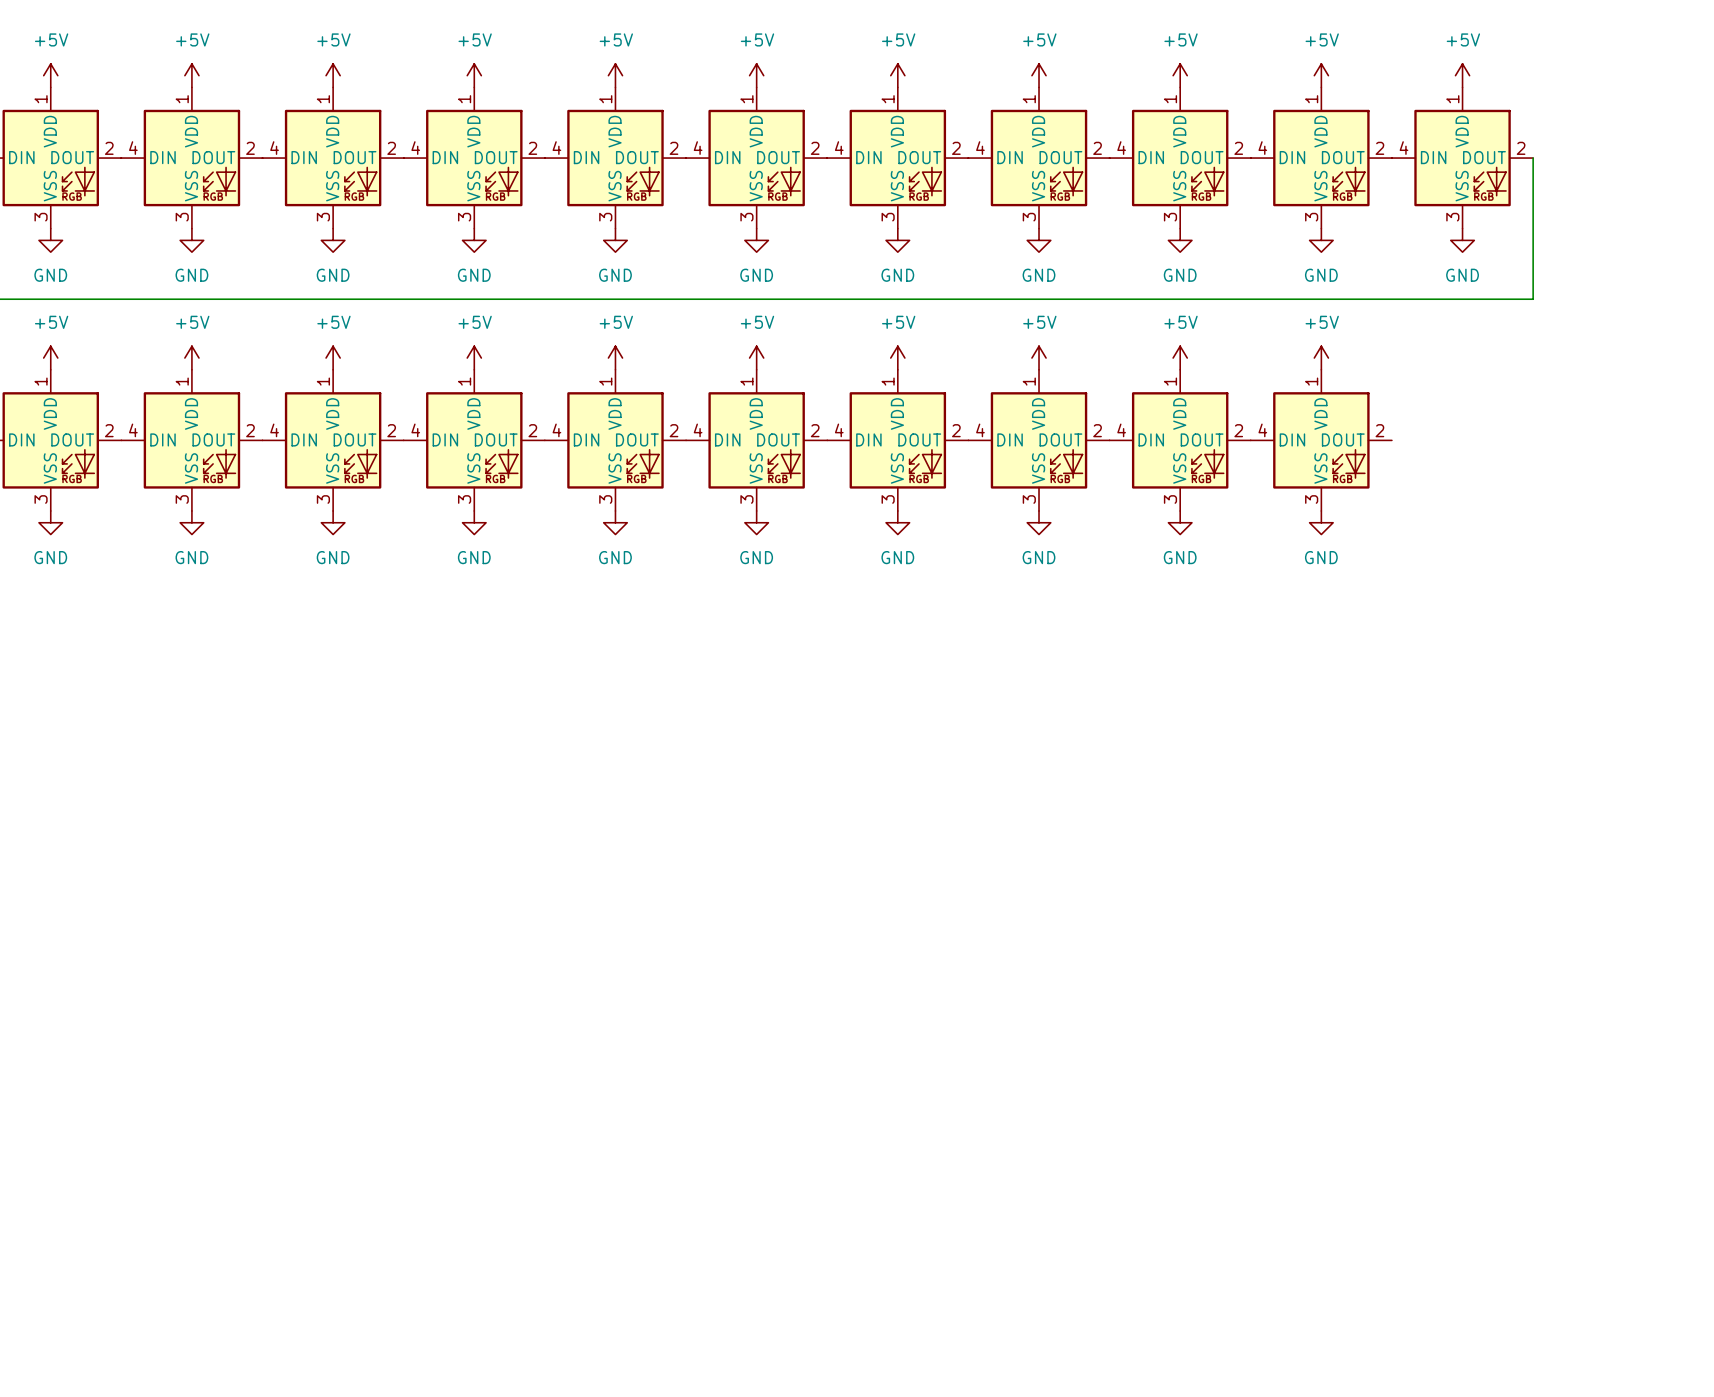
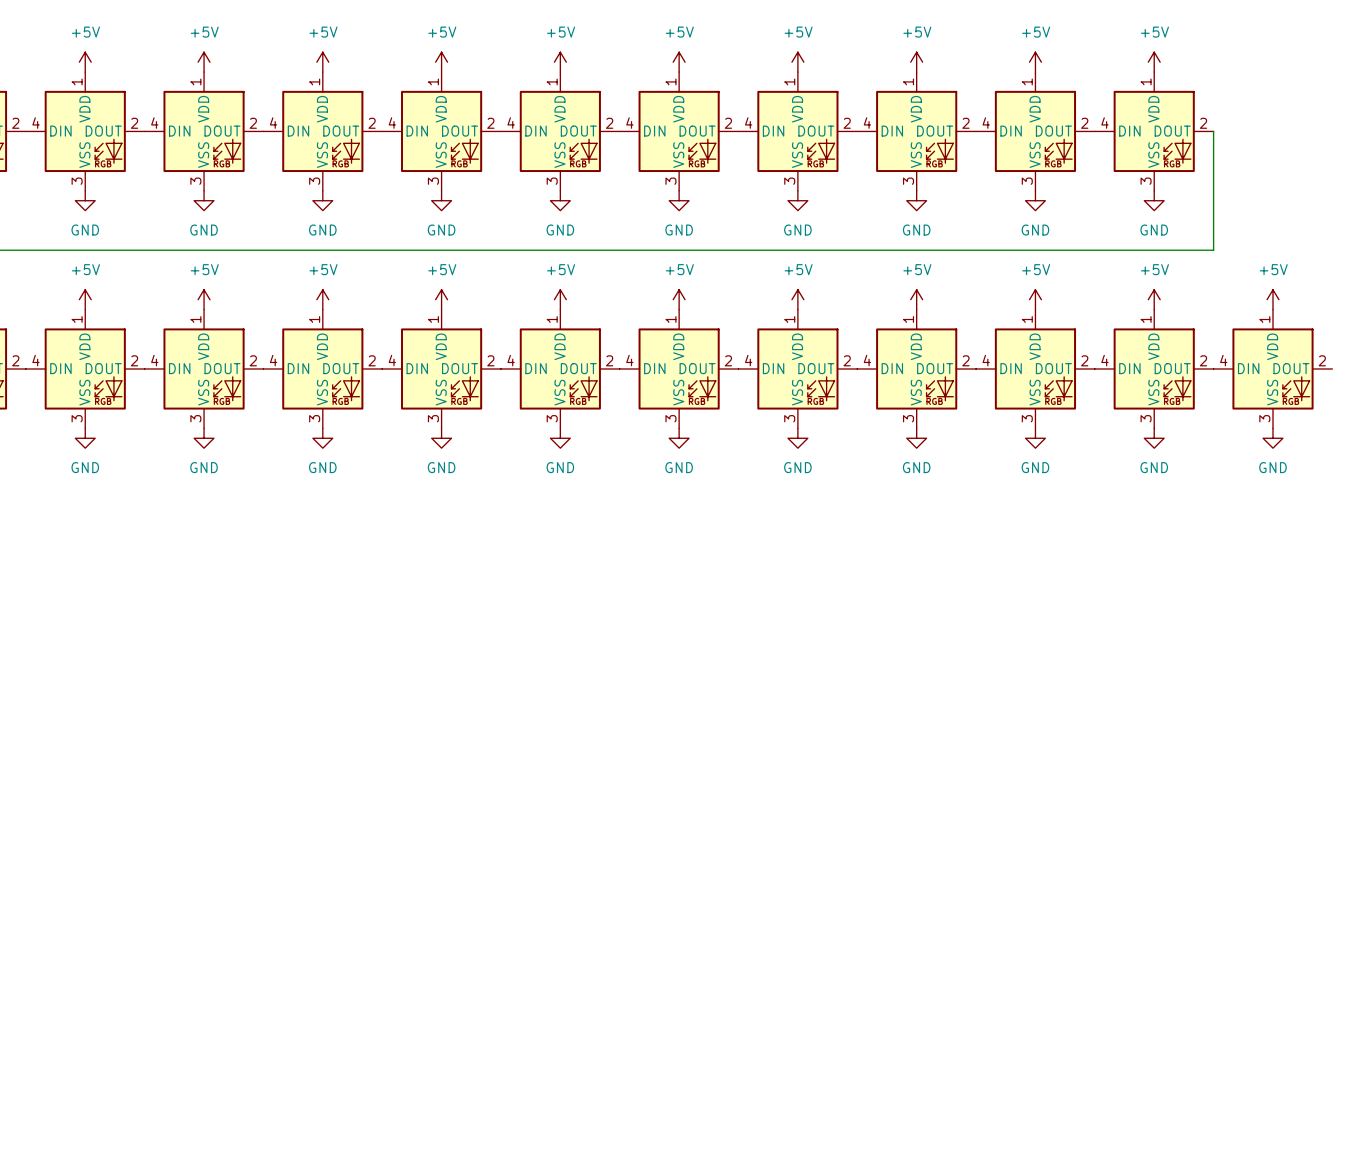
power symbol: none -> +5V (1154, 299)
power symbol: none -> +5V (1272, 299)
part: none -> (1154, 368)
part: none -> (1272, 368)
power symbol: none -> GND (1154, 438)
power symbol: none -> GND (1272, 438)

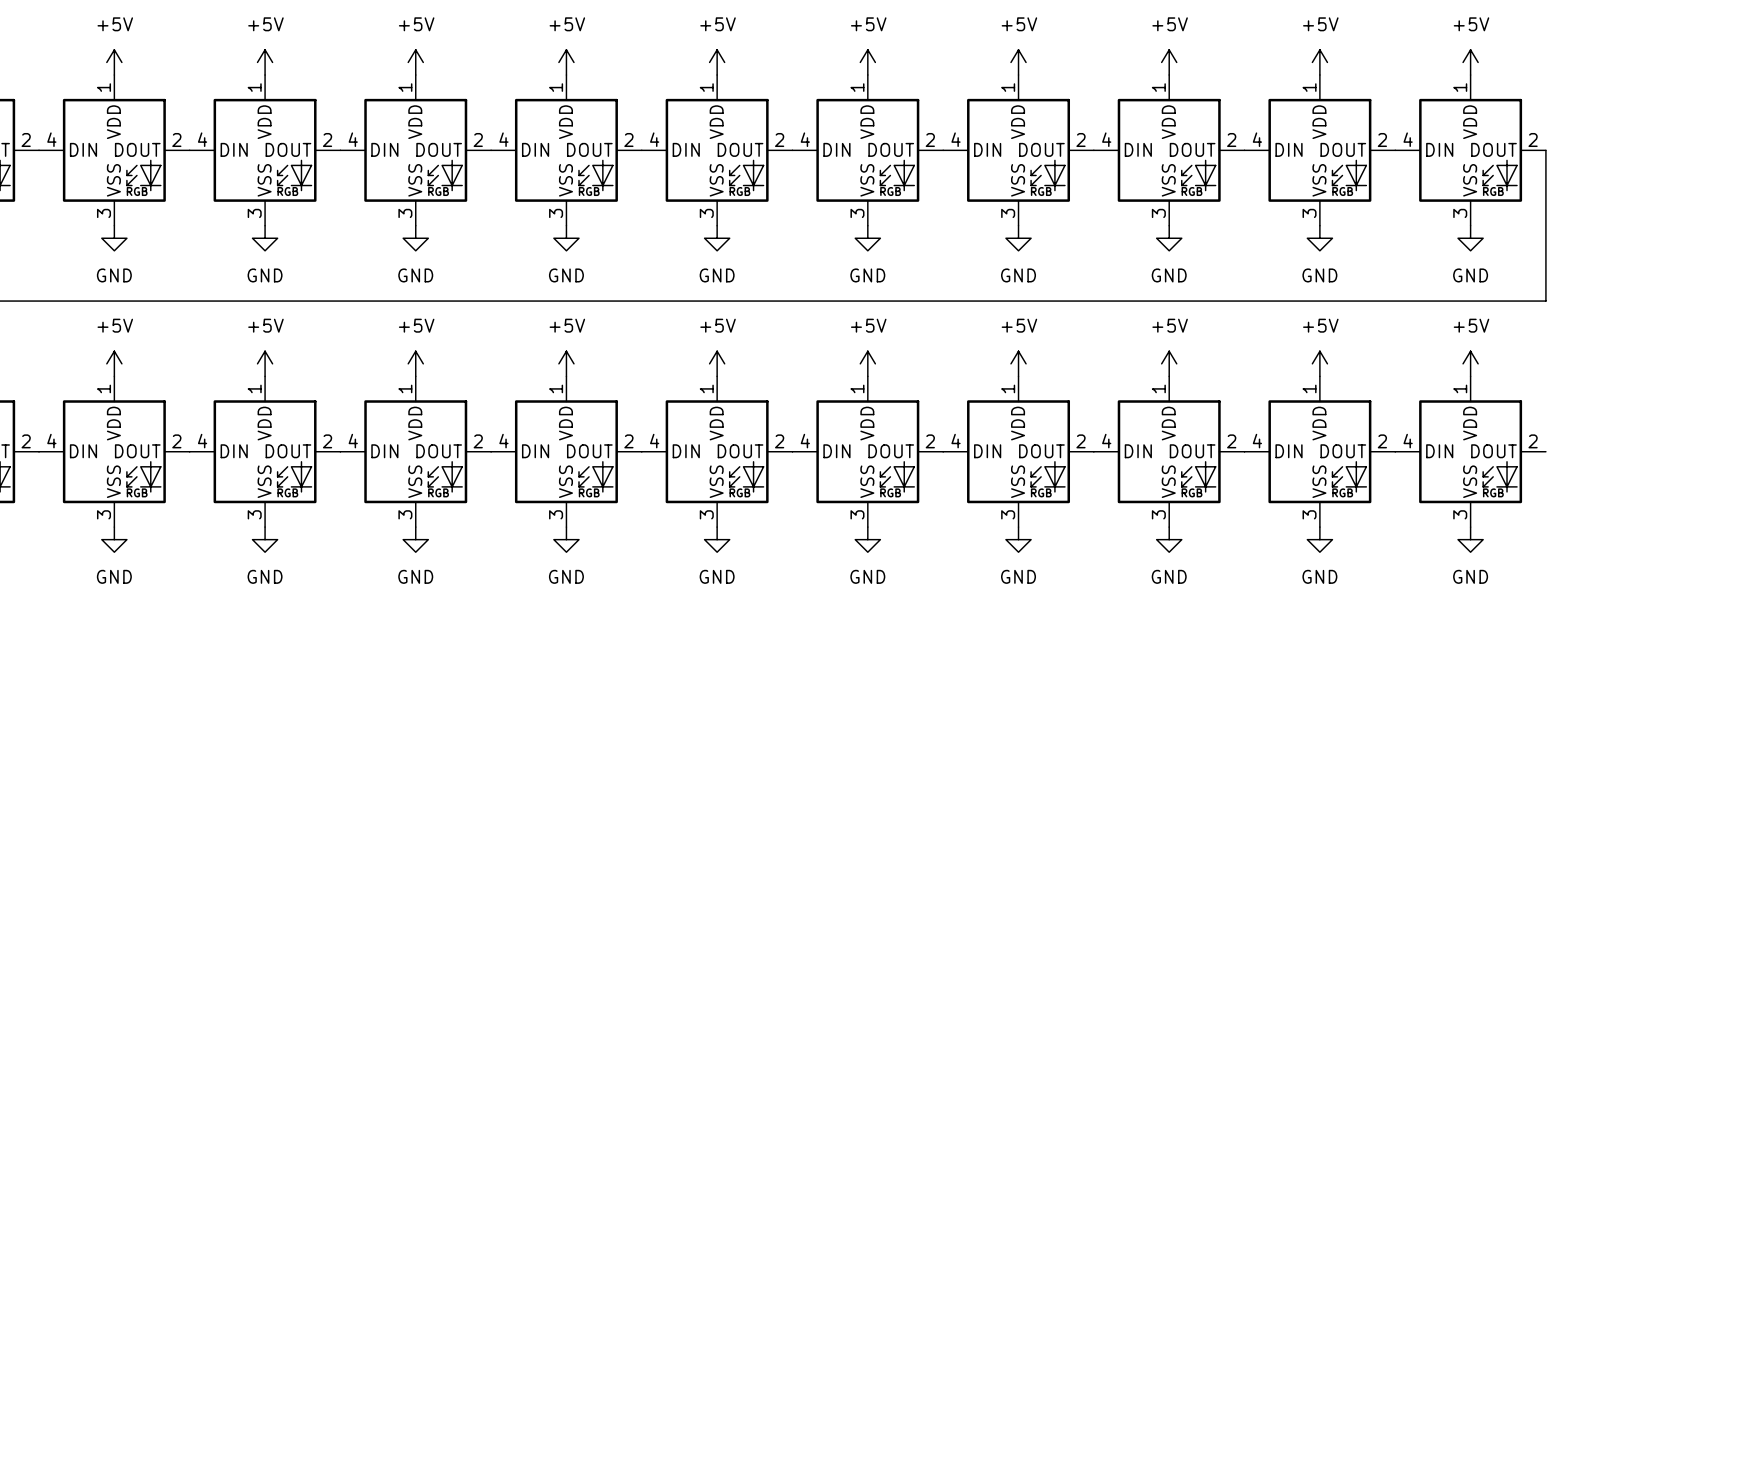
power symbol: +5V (1272, 299) -> none
part: (1272, 368) -> none
power symbol: GND (1272, 438) -> none

